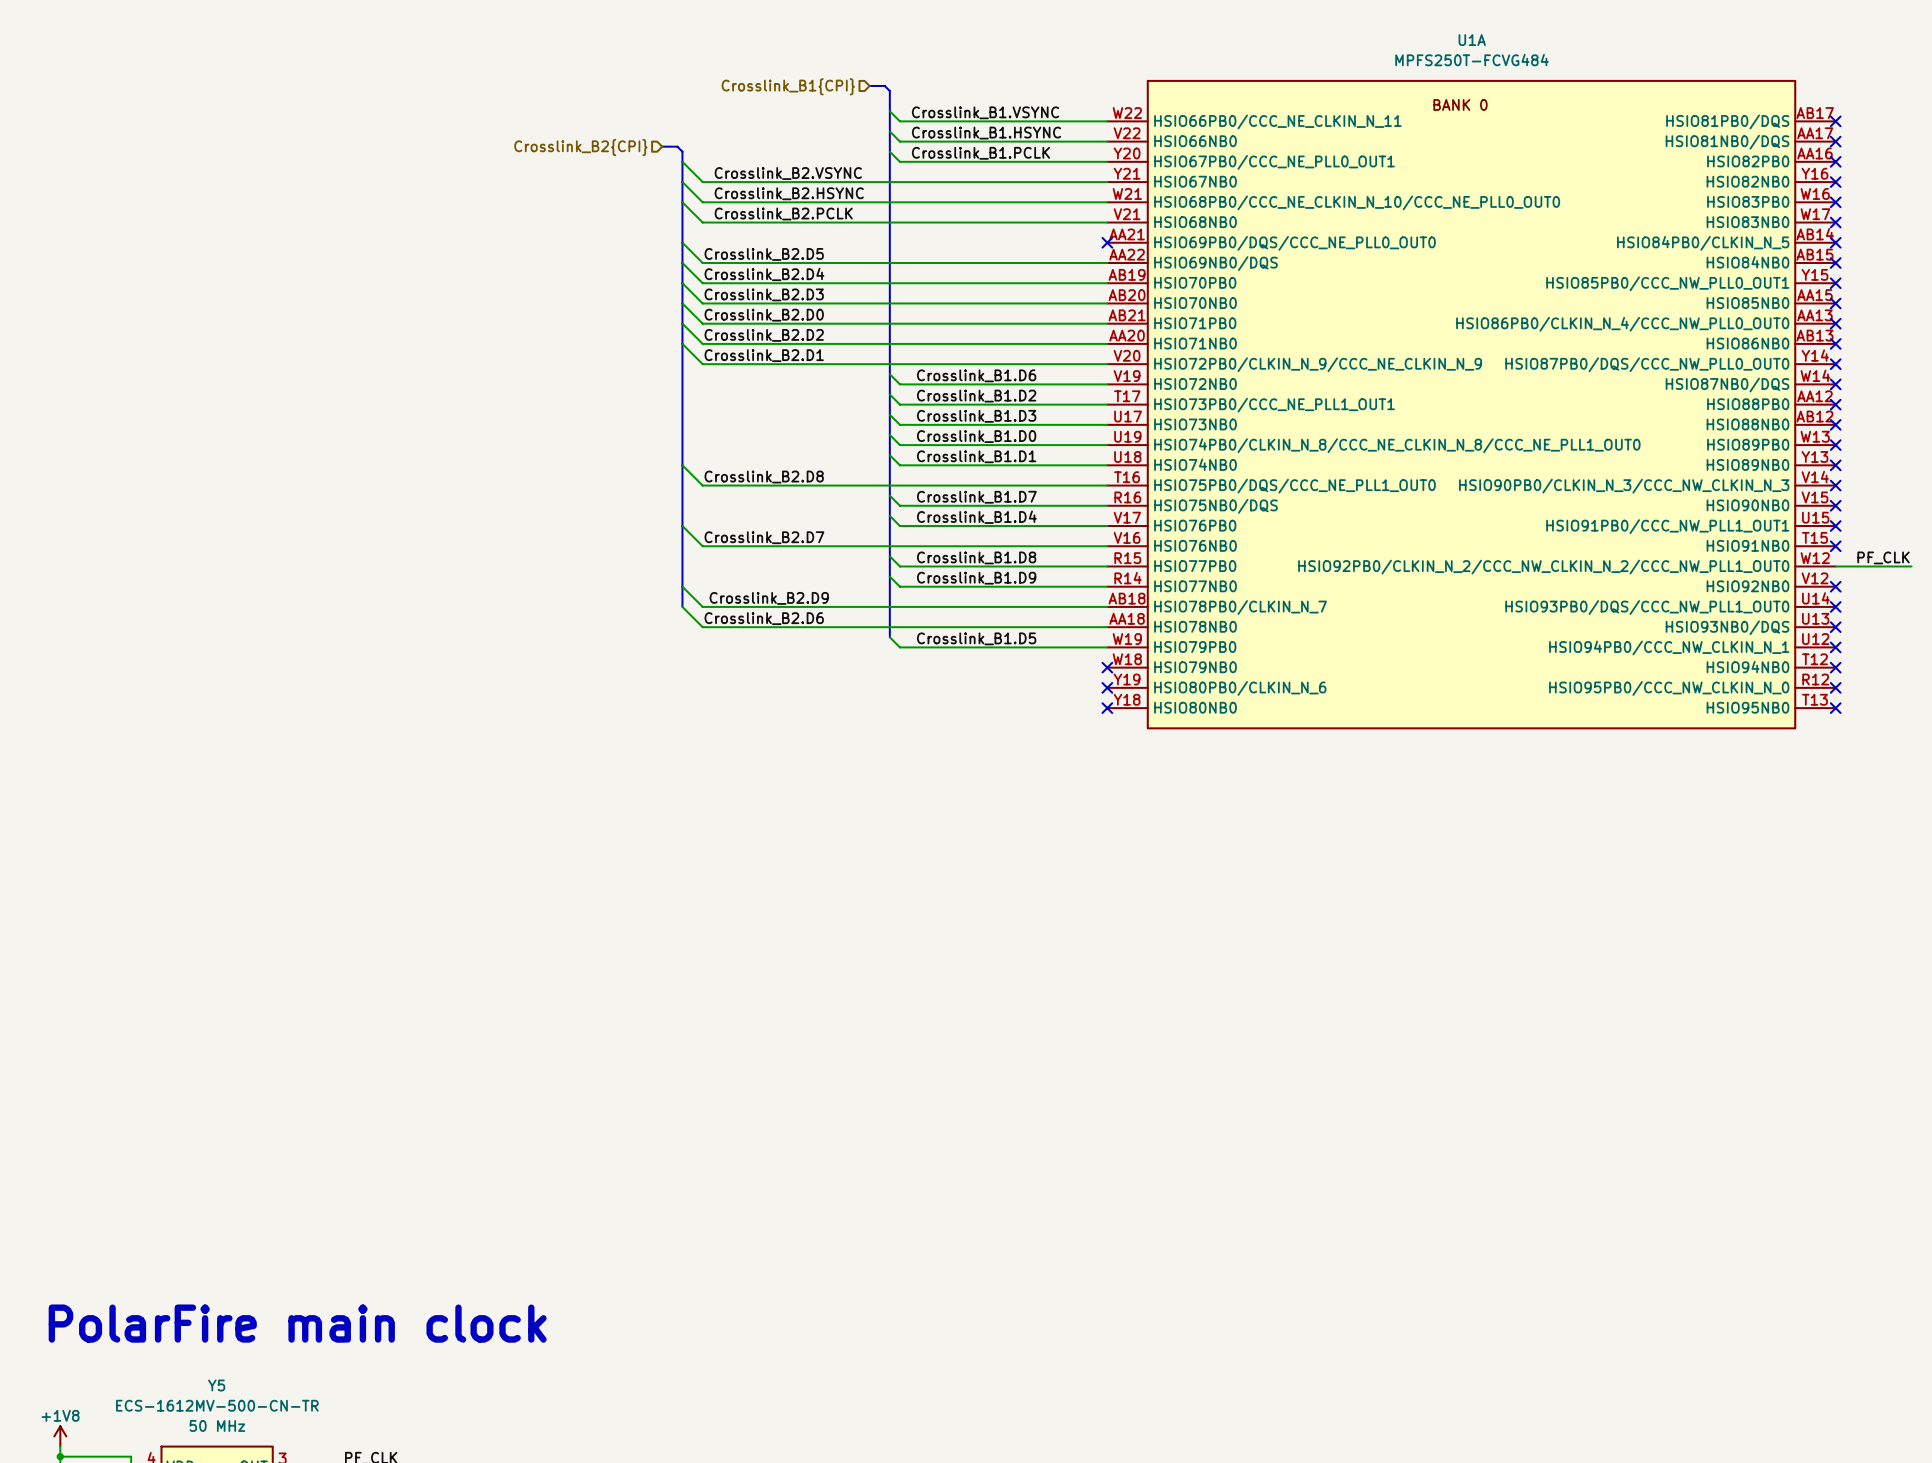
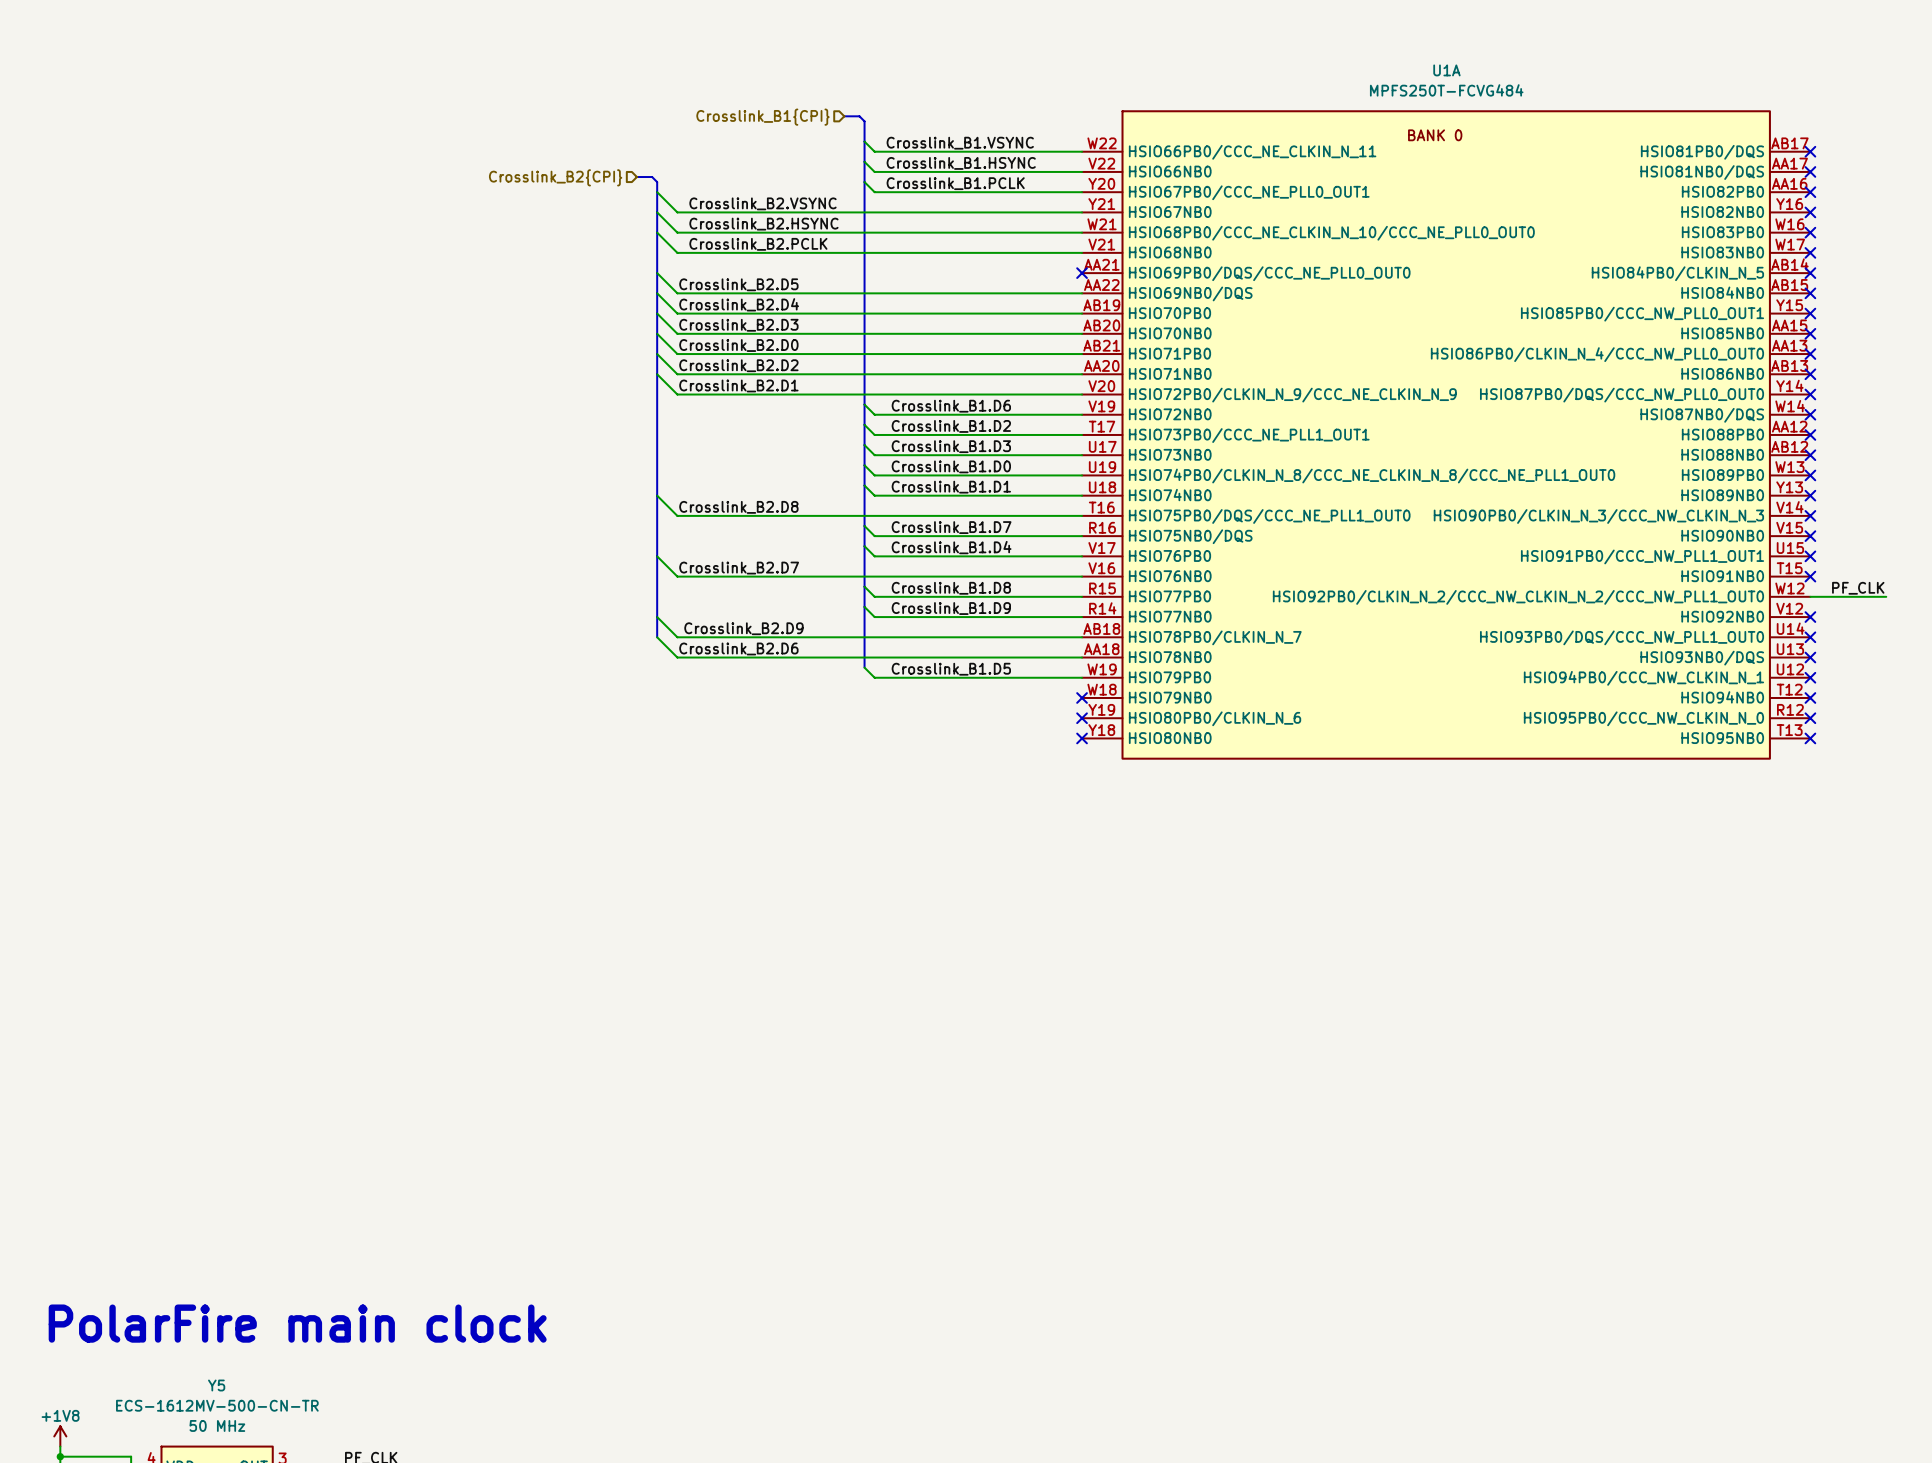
bus: (869, 85) (884, 85) (889, 91) (889, 637) -> (844, 116) (859, 116) (864, 121) (864, 667)
hierarchical label position: Crosslink_B1{CPI} (788, 86) -> Crosslink_B1{CPI} (762, 117)
wire: (889, 111) (899, 121) (1107, 121) -> (864, 141) (874, 151) (1082, 151)
label position: Crosslink_B1.VSYNC (985, 112) -> Crosslink_B1.VSYNC (960, 143)
no-connect mark: (1835, 121) -> none
wire: (889, 131) (899, 141) (1107, 141) -> (864, 161) (874, 171) (1082, 171)
label position: Crosslink_B1.HSYNC (986, 133) -> Crosslink_B1.HSYNC (961, 163)
no-connect mark: (1835, 141) -> none
bus: (662, 146) (677, 146) (682, 151) (682, 606) -> (636, 177) (652, 177) (657, 182) (657, 637)
hierarchical label position: Crosslink_B2{CPI} (580, 147) -> Crosslink_B2{CPI} (555, 177)
wire: (889, 151) (899, 161) (1107, 161) -> (864, 182) (874, 192) (1082, 192)
no-connect mark: none -> (1810, 151)
label position: Crosslink_B1.PCLK (980, 153) -> Crosslink_B1.PCLK (955, 183)
wire: (682, 161) (702, 182) (1107, 182) -> (657, 192) (677, 212) (1082, 212)
no-connect mark: (1835, 161) -> none
no-connect mark: none -> (1810, 171)
label position: Crosslink_B2.VSYNC (788, 173) -> Crosslink_B2.VSYNC (762, 203)
wire: (682, 182) (702, 202) (1107, 202) -> (657, 212) (677, 232) (1082, 232)
no-connect mark: (1835, 182) -> none
no-connect mark: none -> (1810, 192)
label position: Crosslink_B2.HSYNC (789, 193) -> Crosslink_B2.HSYNC (763, 224)
wire: (682, 202) (702, 222) (1107, 222) -> (657, 232) (677, 252) (1082, 252)
no-connect mark: (1835, 202) -> none
no-connect mark: none -> (1810, 212)
label position: Crosslink_B2.PCLK (783, 213) -> Crosslink_B2.PCLK (758, 244)
no-connect mark: (1835, 222) -> none
no-connect mark: none -> (1810, 232)
wire: (682, 242) (702, 263) (1107, 263) -> (657, 273) (677, 293) (1082, 293)
no-connect mark position: (1107, 242) -> (1082, 273)
no-connect mark: (1835, 242) -> none
no-connect mark: none -> (1810, 252)
label position: Crosslink_B2.D5 (764, 254) -> Crosslink_B2.D5 (738, 284)
wire: (682, 263) (702, 283) (1107, 283) -> (657, 293) (677, 313) (1082, 313)
no-connect mark: (1835, 263) -> none
no-connect mark: none -> (1810, 273)
label position: Crosslink_B2.D4 (764, 274) -> Crosslink_B2.D4 (739, 304)
wire: (682, 283) (702, 303) (1107, 303) -> (657, 313) (677, 333) (1082, 333)
no-connect mark: (1835, 283) -> none
no-connect mark: none -> (1810, 293)
label position: Crosslink_B2.D3 (764, 294) -> Crosslink_B2.D3 (738, 325)
wire: (682, 303) (702, 323) (1107, 323) -> (657, 333) (677, 354) (1082, 354)
no-connect mark: (1835, 303) -> none
no-connect mark: none -> (1810, 313)
label position: Crosslink_B2.D0 (764, 315) -> Crosslink_B2.D0 (738, 345)
wire: (682, 323) (702, 343) (1107, 343) -> (657, 354) (677, 374) (1082, 374)
no-connect mark: (1835, 323) -> none
no-connect mark: none -> (1810, 333)
label position: Crosslink_B2.D2 (764, 335) -> Crosslink_B2.D2 (738, 365)
wire: (682, 343) (702, 364) (1107, 364) -> (657, 374) (677, 394) (1082, 394)
no-connect mark: (1835, 343) -> none
no-connect mark: none -> (1810, 354)
label position: Crosslink_B2.D1 (764, 355) -> Crosslink_B2.D1 (738, 385)
no-connect mark: (1835, 364) -> none
wire: (889, 374) (899, 384) (1107, 384) -> (864, 404) (874, 414) (1082, 414)
no-connect mark: none -> (1810, 374)
label position: Crosslink_B1.D6 (976, 375) -> Crosslink_B1.D6 (951, 406)
no-connect mark: (1835, 384) -> none
wire: (889, 394) (899, 404) (1107, 404) -> (864, 424) (874, 434) (1082, 434)
no-connect mark: none -> (1810, 394)
label position: Crosslink_B1.D2 (976, 396) -> Crosslink_B1.D2 (951, 426)
U1A position: (1471, 404) -> (1446, 434)
no-connect mark: (1835, 404) -> none
wire: (889, 414) (899, 424) (1107, 424) -> (864, 445) (874, 455) (1082, 455)
no-connect mark: none -> (1810, 414)
label position: Crosslink_B1.D3 (976, 416) -> Crosslink_B1.D3 (951, 446)
no-connect mark: (1835, 424) -> none
wire: (889, 434) (899, 445) (1107, 445) -> (864, 465) (874, 475) (1082, 475)
no-connect mark: none -> (1810, 434)
label position: Crosslink_B1.D0 (976, 436) -> Crosslink_B1.D0 (951, 466)
no-connect mark: (1835, 445) -> none
wire: (889, 455) (899, 465) (1107, 465) -> (864, 485) (874, 495) (1082, 495)
no-connect mark: none -> (1810, 455)
label position: Crosslink_B1.D1 (976, 456) -> Crosslink_B1.D1 (951, 487)
wire: (682, 465) (702, 485) (1107, 485) -> (657, 495) (677, 515) (1082, 515)
no-connect mark: (1835, 465) -> none
no-connect mark: none -> (1810, 475)
label position: Crosslink_B2.D8 (764, 477) -> Crosslink_B2.D8 (738, 507)
no-connect mark: (1835, 485) -> none
wire: (889, 495) (899, 505) (1107, 505) -> (864, 526) (874, 536) (1082, 536)
no-connect mark: none -> (1810, 495)
label position: Crosslink_B1.D7 (976, 497) -> Crosslink_B1.D7 (951, 527)
no-connect mark: (1835, 505) -> none
wire: (889, 515) (899, 526) (1107, 526) -> (864, 546) (874, 556) (1082, 556)
no-connect mark: none -> (1810, 515)
label position: Crosslink_B1.D4 (976, 517) -> Crosslink_B1.D4 (951, 547)
wire: (682, 526) (702, 546) (1107, 546) -> (657, 556) (677, 576) (1082, 576)
no-connect mark: (1835, 526) -> none
no-connect mark: none -> (1810, 536)
label position: Crosslink_B2.D7 (764, 537) -> Crosslink_B2.D7 (739, 568)
no-connect mark: (1835, 546) -> none
wire: (889, 556) (899, 566) (1107, 566) -> (864, 586) (874, 596) (1082, 596)
no-connect mark: none -> (1810, 556)
label position: Crosslink_B1.D8 (976, 557) -> Crosslink_B1.D8 (951, 588)
label position: PF_CLK (1883, 557) -> PF_CLK (1858, 588)
wire: (1835, 566) (1911, 566) -> (1810, 596) (1886, 596)
wire: (889, 576) (899, 586) (1107, 586) -> (864, 606) (874, 617) (1082, 617)
no-connect mark: none -> (1810, 576)
label position: Crosslink_B1.D9 (976, 578) -> Crosslink_B1.D9 (951, 608)
wire: (682, 586) (702, 606) (1107, 606) -> (657, 617) (677, 637) (1082, 637)
no-connect mark: (1835, 586) -> none
label position: Crosslink_B2.D9 (769, 598) -> Crosslink_B2.D9 (743, 628)
wire: (682, 606) (702, 627) (1107, 627) -> (657, 637) (677, 657) (1082, 657)
no-connect mark: (1835, 606) -> none
no-connect mark: none -> (1810, 617)
label position: Crosslink_B2.D6 (764, 618) -> Crosslink_B2.D6 (738, 648)
no-connect mark: (1835, 627) -> none
wire: (889, 637) (899, 647) (1107, 647) -> (864, 667) (874, 677) (1082, 677)
no-connect mark: none -> (1810, 637)
label position: Crosslink_B1.D5 (976, 638) -> Crosslink_B1.D5 (951, 669)
no-connect mark: (1835, 647) -> none
no-connect mark: none -> (1810, 657)
no-connect mark: (1107, 667) -> none
no-connect mark: (1835, 667) -> none
no-connect mark: none -> (1810, 677)
no-connect mark: (1107, 687) -> none
no-connect mark: (1835, 687) -> none
no-connect mark: none -> (1082, 697)
no-connect mark: none -> (1810, 697)
no-connect mark: (1107, 708) -> none
no-connect mark: (1835, 708) -> none
no-connect mark: none -> (1082, 718)
no-connect mark: none -> (1810, 718)
no-connect mark: none -> (1082, 738)
no-connect mark: none -> (1810, 738)

